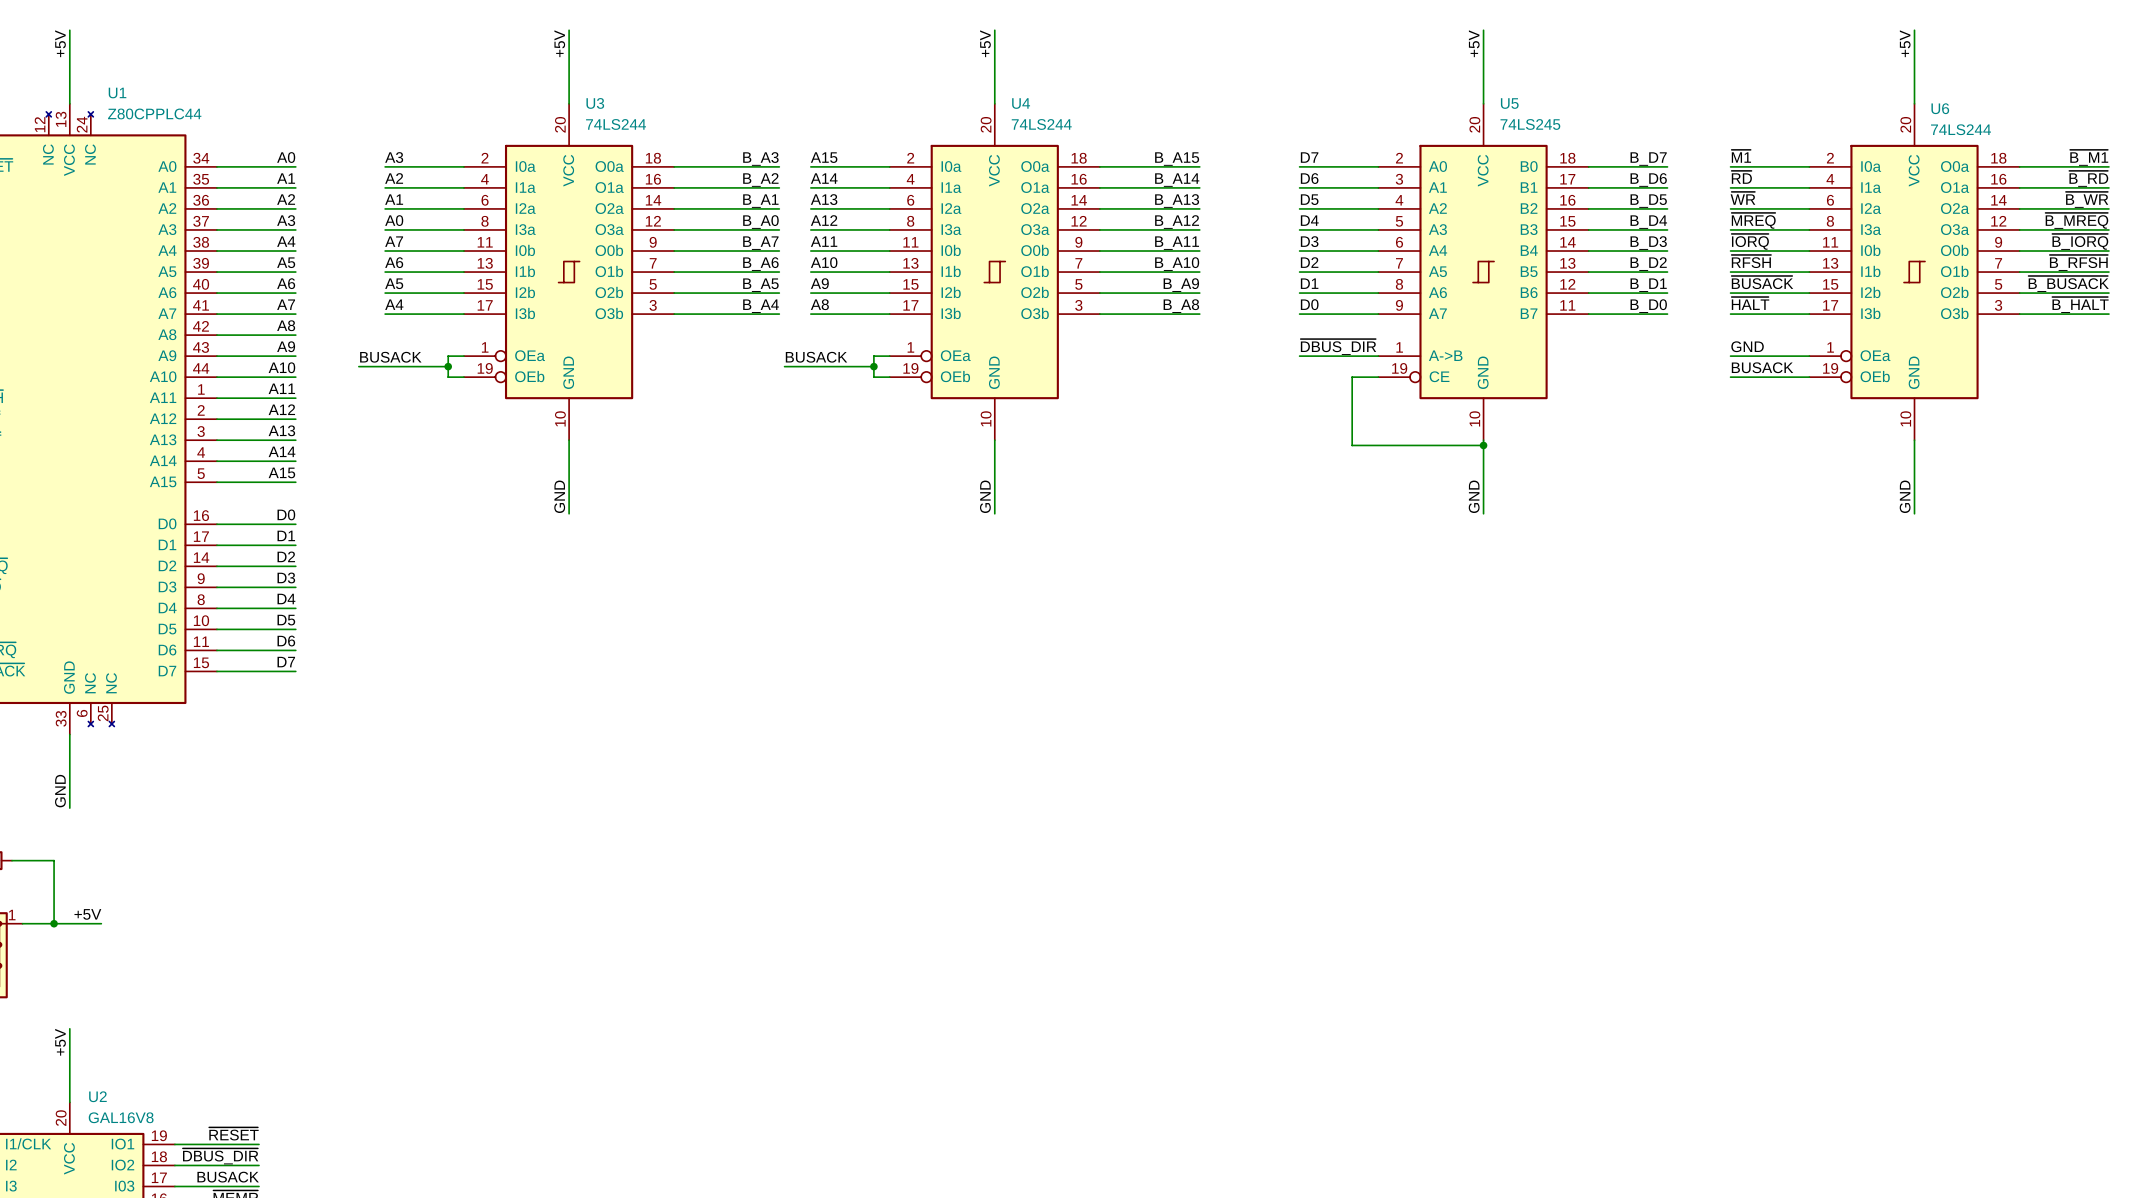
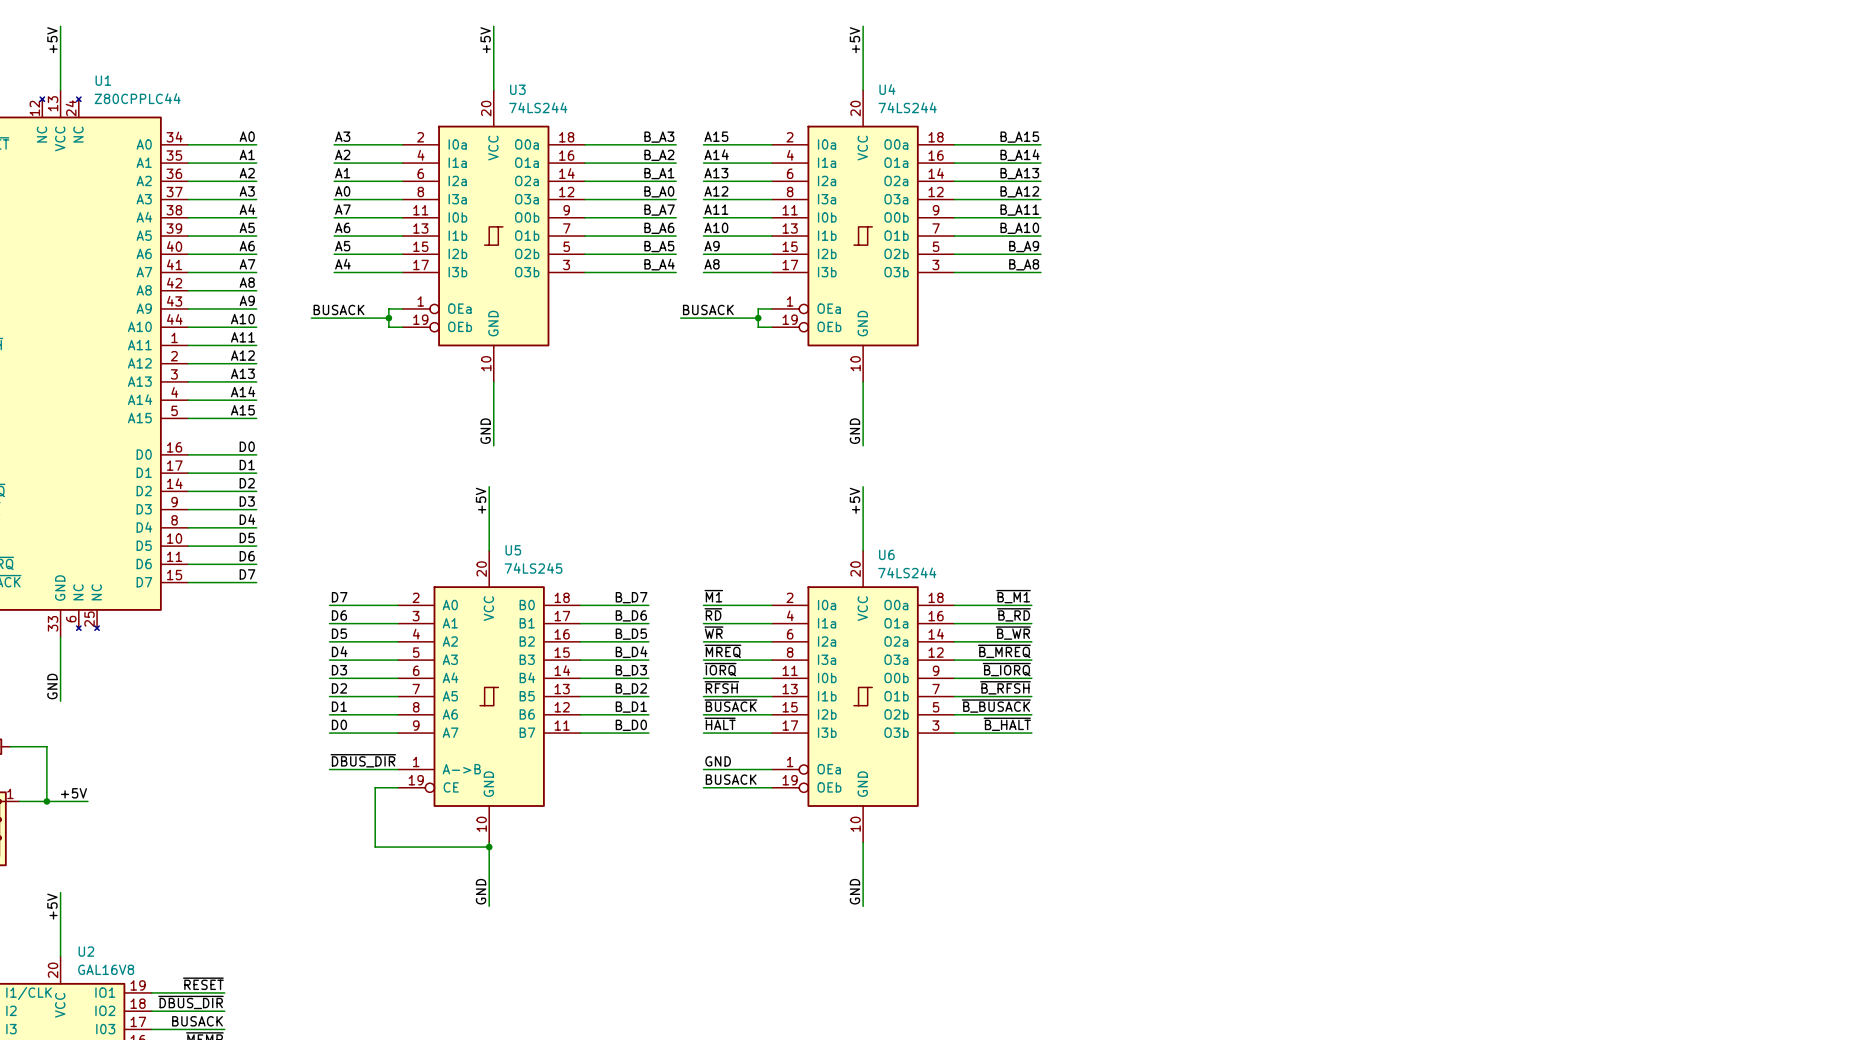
wire: (1483, 30) (1483, 103) -> none
wire: (1914, 30) (1914, 103) -> none
label: +5V (1474, 43) -> none
label: +5V (1905, 43) -> none
label: ~{M1} (1741, 156) -> none
label: D7 (1309, 157) -> none
label: ~{B_M1} (2089, 157) -> none
label: B_D7 (1648, 159) -> none
wire: (1299, 166) (1378, 166) -> none
wire: (1588, 166) (1667, 166) -> none
wire: (1730, 166) (1809, 166) -> none
wire: (2019, 166) (2108, 166) -> none
label: ~{RD} (1741, 177) -> none
label: D6 (1309, 178) -> none
label: ~{B_RD} (2088, 178) -> none
label: B_D6 (1648, 179) -> none
wire: (1299, 187) (1378, 187) -> none
wire: (1588, 187) (1667, 187) -> none
wire: (1730, 187) (1809, 187) -> none
wire: (2019, 187) (2108, 187) -> none
label: ~{WR} (1742, 198) -> none
label: D5 (1309, 199) -> none
label: ~{B_WR} (2087, 199) -> none
label: B_D5 (1648, 201) -> none
wire: (1299, 208) (1378, 208) -> none
wire: (1588, 208) (1667, 208) -> none
wire: (1730, 208) (1809, 208) -> none
wire: (2019, 208) (2108, 208) -> none
label: D4 (1309, 220) -> none
label: ~{MREQ} (1753, 220) -> none
label: ~{B_MREQ} (2076, 220) -> none
label: B_D4 (1648, 222) -> none
wire: (1299, 229) (1378, 229) -> none
wire: (1588, 229) (1667, 229) -> none
wire: (1730, 229) (1809, 229) -> none
wire: (2019, 229) (2108, 229) -> none
label: D3 (1309, 241) -> none
label: ~{IORQ} (1750, 241) -> none
label: ~{B_IORQ} (2080, 241) -> none
label: B_D3 (1648, 243) -> none
wire: (1299, 251) (1378, 251) -> none
wire: (1588, 251) (1667, 251) -> none
wire: (1730, 251) (1809, 251) -> none
wire: (2019, 251) (2108, 251) -> none
label: ~{RFSH} (1751, 261) -> none
label: D2 (1309, 262) -> none
label: ~{B_RFSH} (2078, 262) -> none
label: B_D2 (1648, 264) -> none
wire: (1299, 272) (1378, 272) -> none
U5 position: (1483, 272) -> (489, 696)
wire: (1588, 272) (1667, 272) -> none
wire: (1730, 272) (1809, 272) -> none
U6 position: (1914, 272) -> (863, 696)
wire: (2019, 272) (2108, 272) -> none
label: ~{BUSACK} (1762, 282) -> none
label: D1 (1309, 283) -> none
label: ~{B_BUSACK} (2068, 283) -> none
label: B_D1 (1648, 285) -> none
wire: (1299, 293) (1378, 293) -> none
wire: (1588, 293) (1667, 293) -> none
wire: (1730, 293) (1809, 293) -> none
wire: (2019, 293) (2108, 293) -> none
label: ~{HALT} (1750, 303) -> none
label: D0 (1309, 304) -> none
label: ~{B_HALT} (2080, 305) -> none
label: B_D0 (1648, 306) -> none
wire: (1299, 314) (1378, 314) -> none
wire: (1588, 314) (1667, 314) -> none
wire: (1730, 314) (1809, 314) -> none
wire: (2019, 314) (2108, 314) -> none
label: GND (1747, 346) -> none
label: ~{DBUS_DIR} (1338, 347) -> none
wire: (1299, 356) (1378, 356) -> none
wire: (1730, 356) (1809, 356) -> none
label: BUSACK (1762, 367) -> none
wire: (1378, 377) (1352, 377) (1352, 445) (1483, 445) -> none
wire: (1730, 377) (1809, 377) -> none
wire: (1483, 440) (1483, 513) -> none
wire: (1914, 440) (1914, 513) -> none
junction: (1483, 445) -> none
label: GND (1474, 496) -> none
label: GND (1905, 496) -> none
wire: none -> (489, 486) (489, 550)
wire: none -> (863, 486) (863, 550)
label: none -> +5V (481, 500)
label: none -> +5V (854, 500)
label: none -> ~{M1} (713, 596)
label: none -> D7 (339, 597)
label: none -> ~{B_M1} (1013, 596)
label: none -> B_D7 (631, 597)
wire: none -> (329, 605) (398, 605)
wire: none -> (580, 605) (648, 605)
wire: none -> (703, 605) (771, 605)
wire: none -> (954, 605) (1031, 605)
label: none -> ~{RD} (713, 614)
label: none -> D6 (339, 615)
label: none -> ~{B_RD} (1013, 614)
label: none -> B_D6 (631, 615)
wire: none -> (329, 623) (398, 623)
wire: none -> (580, 623) (648, 623)
wire: none -> (703, 623) (771, 623)
wire: none -> (954, 623) (1031, 623)
label: none -> ~{WR} (714, 632)
label: none -> D5 (339, 633)
label: none -> ~{B_WR} (1013, 633)
label: none -> B_D5 (631, 634)
wire: none -> (329, 641) (398, 641)
wire: none -> (580, 641) (648, 641)
wire: none -> (703, 641) (771, 641)
wire: none -> (954, 641) (1031, 641)
label: none -> D4 (339, 651)
label: none -> ~{MREQ} (722, 651)
label: none -> ~{B_MREQ} (1004, 651)
label: none -> B_D4 (631, 652)
wire: none -> (329, 660) (398, 660)
wire: none -> (580, 660) (648, 660)
wire: none -> (703, 660) (771, 660)
wire: none -> (954, 660) (1031, 660)
label: none -> D3 (339, 670)
label: none -> ~{IORQ} (720, 669)
label: none -> ~{B_IORQ} (1006, 669)
label: none -> B_D3 (631, 670)
wire: none -> (329, 678) (398, 678)
wire: none -> (580, 678) (648, 678)
wire: none -> (703, 678) (771, 678)
wire: none -> (954, 678) (1031, 678)
label: none -> ~{RFSH} (721, 687)
label: none -> D2 (339, 688)
label: none -> ~{B_RFSH} (1005, 687)
label: none -> B_D2 (631, 688)
wire: none -> (329, 696) (398, 696)
wire: none -> (580, 696) (648, 696)
wire: none -> (703, 696) (771, 696)
wire: none -> (954, 696) (1031, 696)
label: none -> ~{BUSACK} (730, 705)
label: none -> D1 (339, 706)
label: none -> ~{B_BUSACK} (996, 706)
label: none -> B_D1 (631, 707)
wire: none -> (329, 714) (398, 714)
wire: none -> (580, 714) (648, 714)
wire: none -> (703, 714) (771, 714)
wire: none -> (954, 714) (1031, 714)
label: none -> ~{HALT} (720, 723)
label: none -> D0 (339, 724)
label: none -> ~{B_HALT} (1007, 724)
label: none -> B_D0 (631, 725)
wire: none -> (329, 733) (398, 733)
wire: none -> (580, 733) (648, 733)
wire: none -> (703, 733) (771, 733)
wire: none -> (954, 733) (1031, 733)
label: none -> ~{DBUS_DIR} (363, 760)
label: none -> GND (718, 761)
wire: none -> (329, 769) (398, 769)
wire: none -> (703, 769) (771, 769)
label: none -> BUSACK (731, 779)
wire: none -> (398, 787) (375, 787) (375, 847) (489, 847)
wire: none -> (703, 787) (771, 787)
wire: none -> (489, 842) (489, 906)
wire: none -> (863, 842) (863, 906)
junction: none -> (489, 847)
label: none -> GND (481, 891)
label: none -> GND (854, 891)

